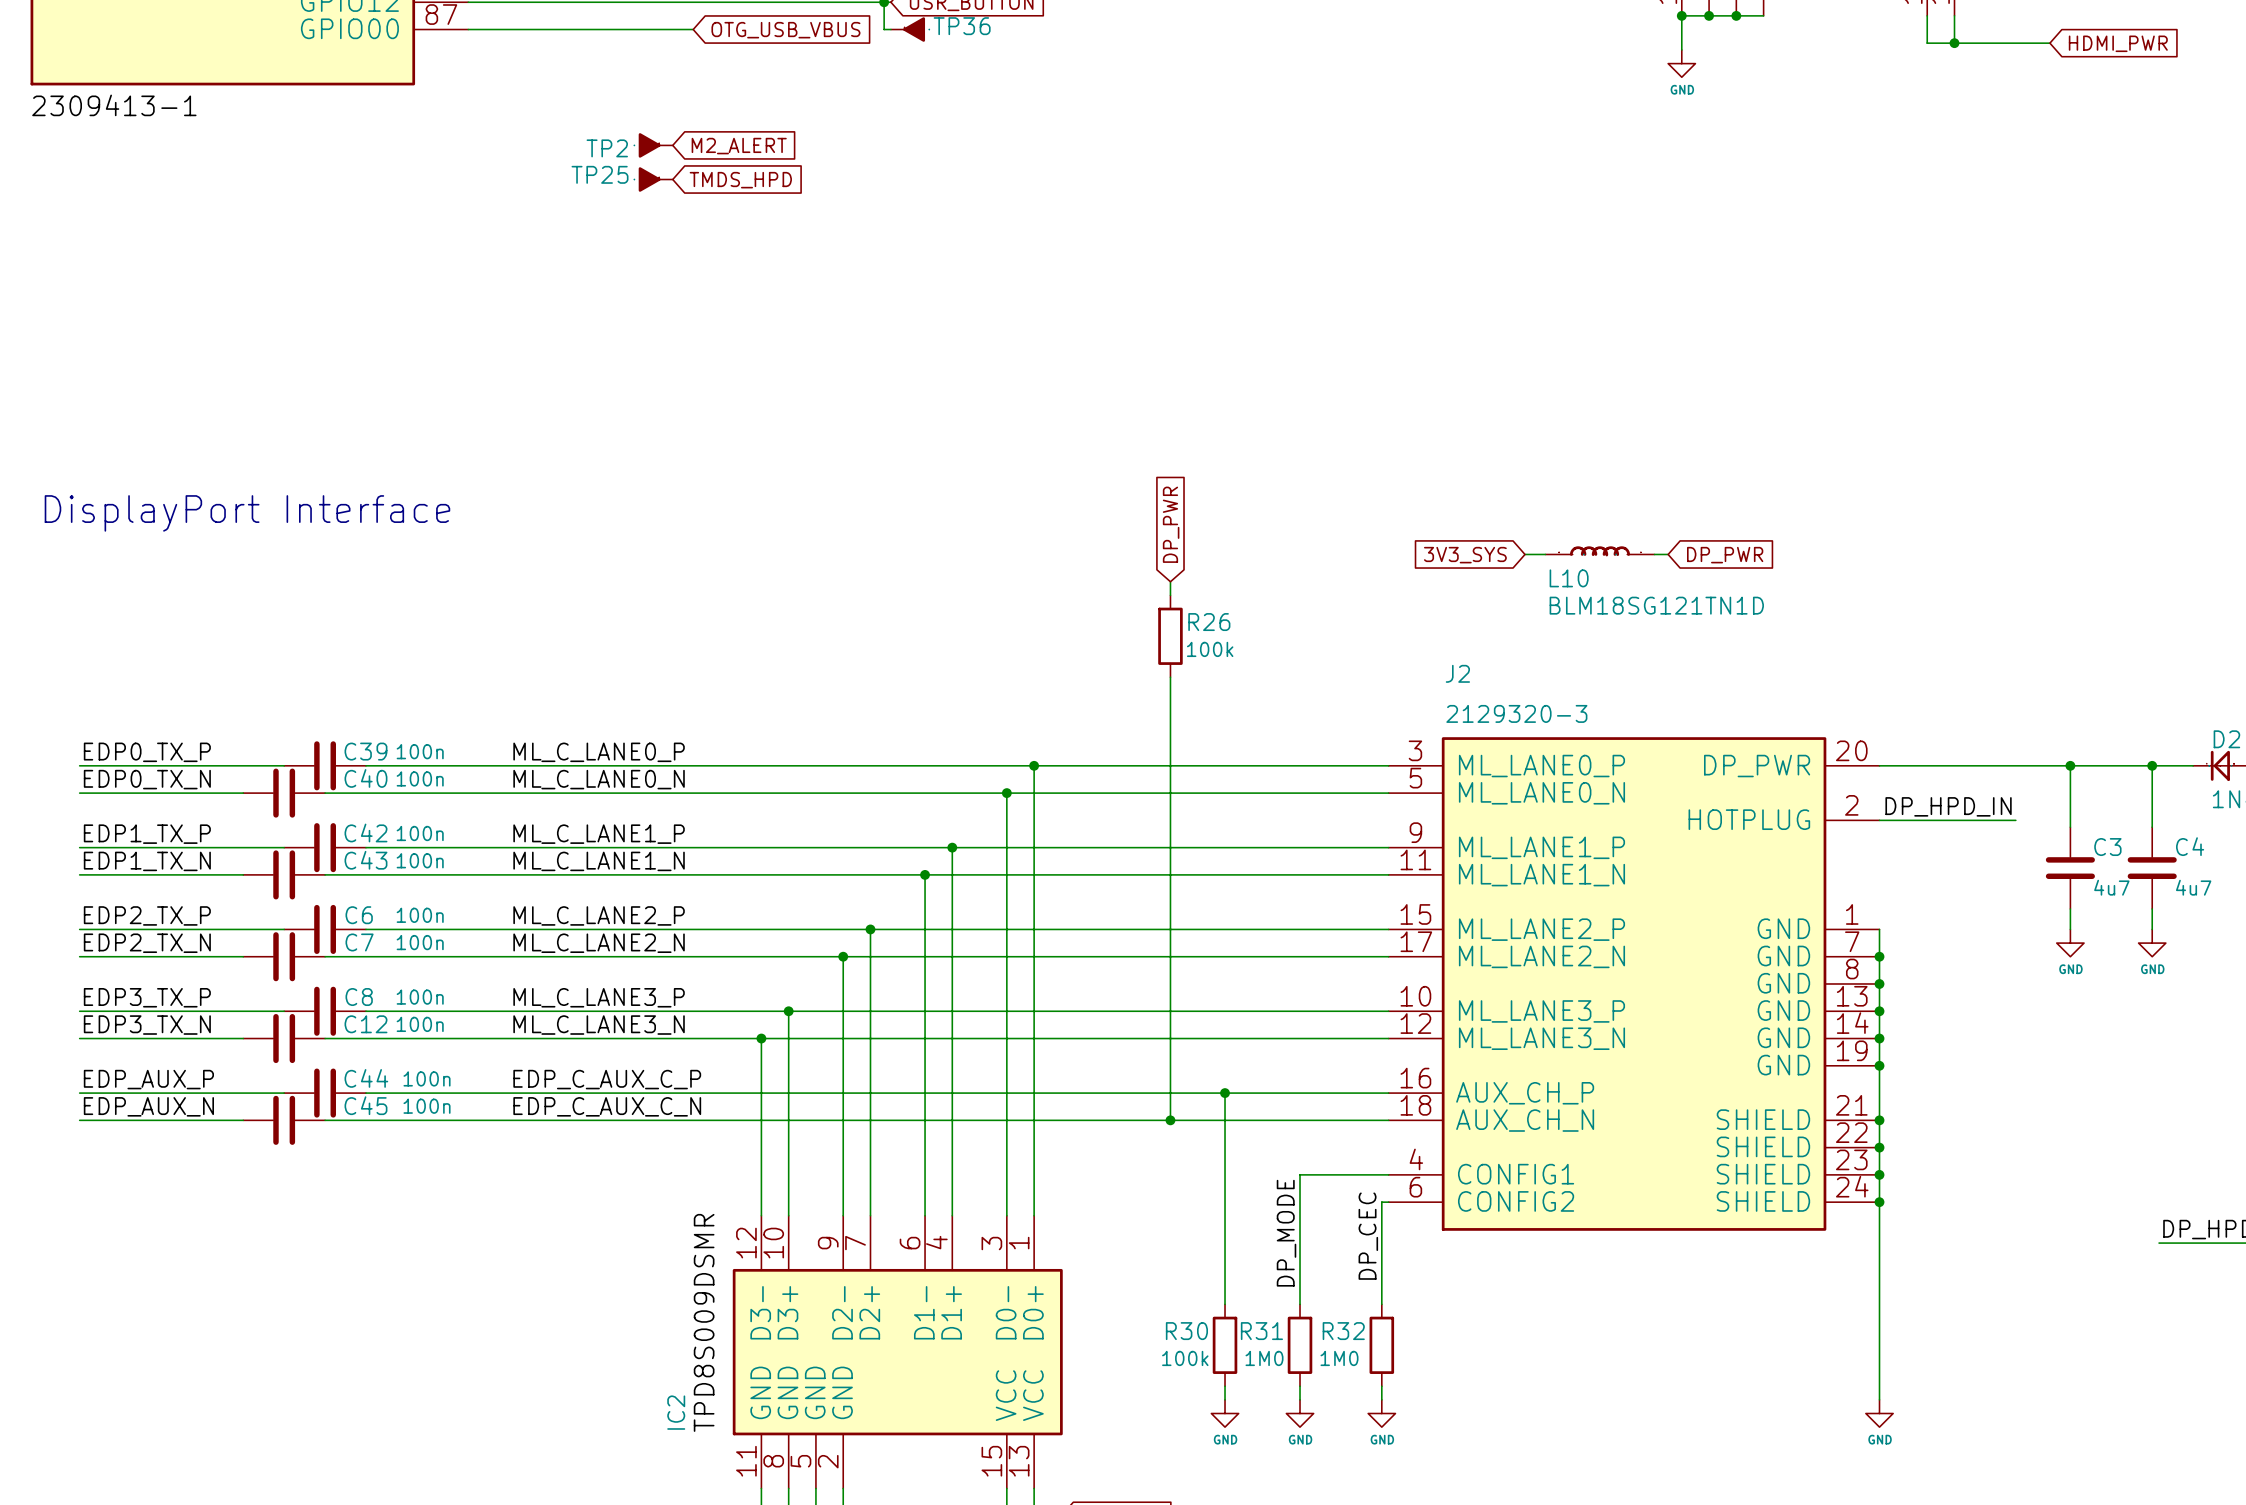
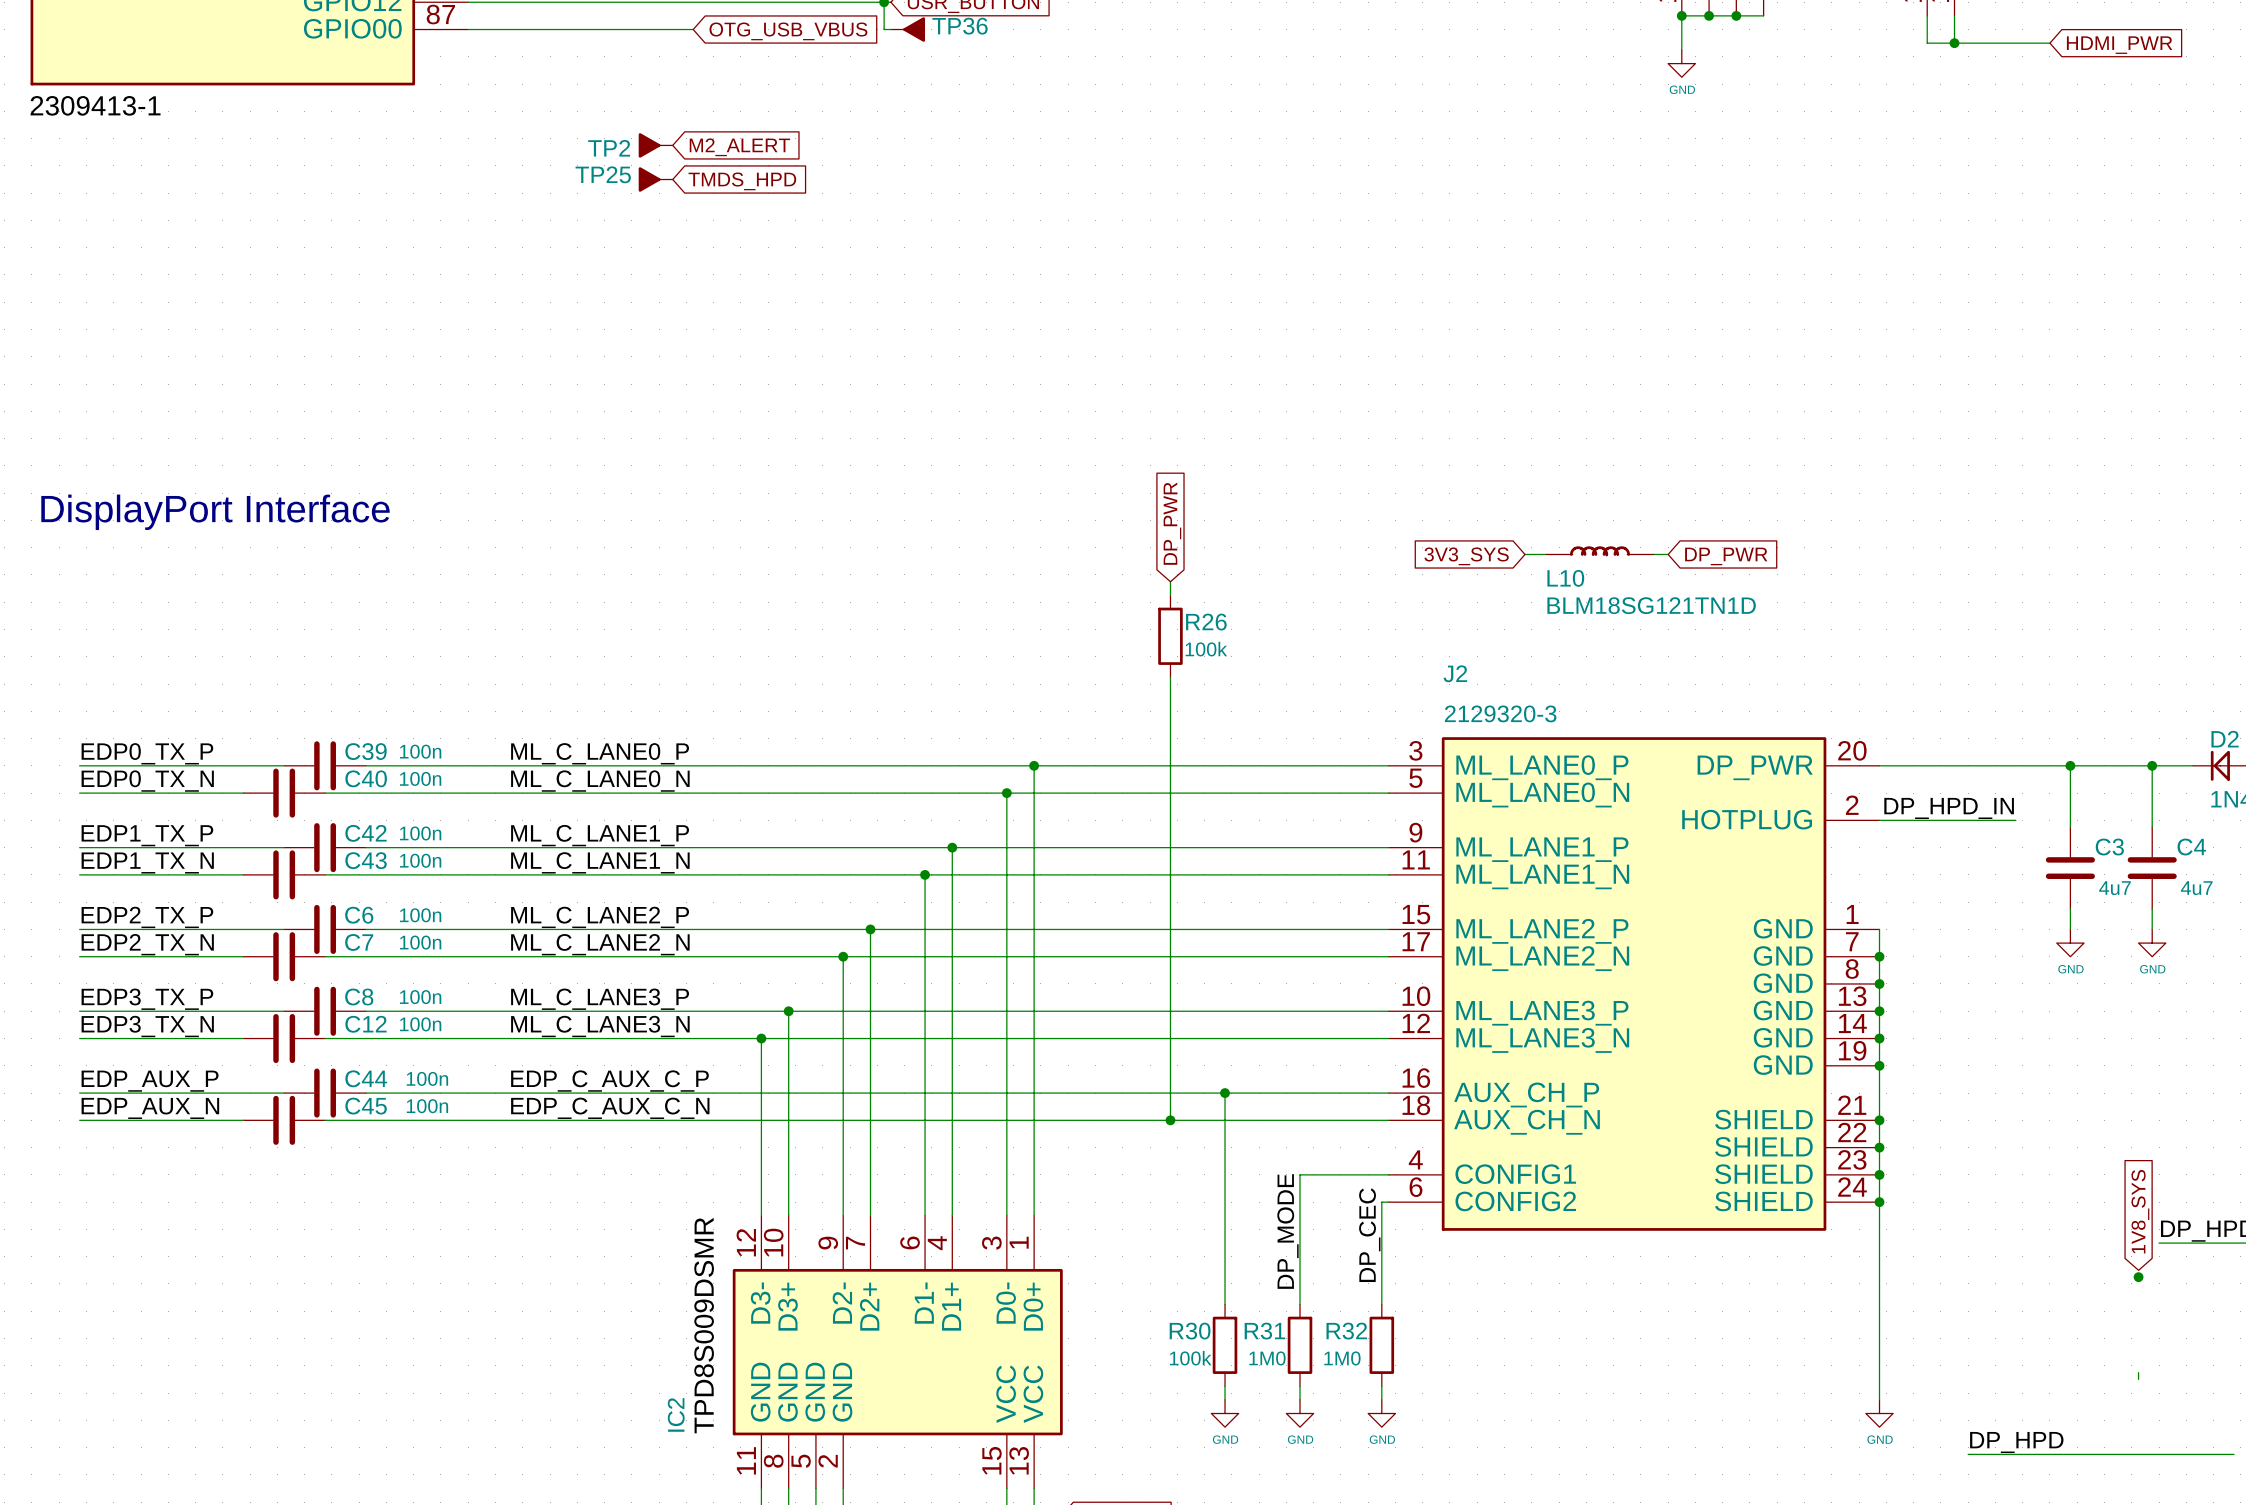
global label: none -> 1V8_SYS (2140, 1211)
junction: none -> (2138, 1277)
wire: none -> (2138, 1372) (2138, 1379)
label: none -> DP_HPD (2016, 1442)
wire: none -> (1968, 1454) (2234, 1454)

